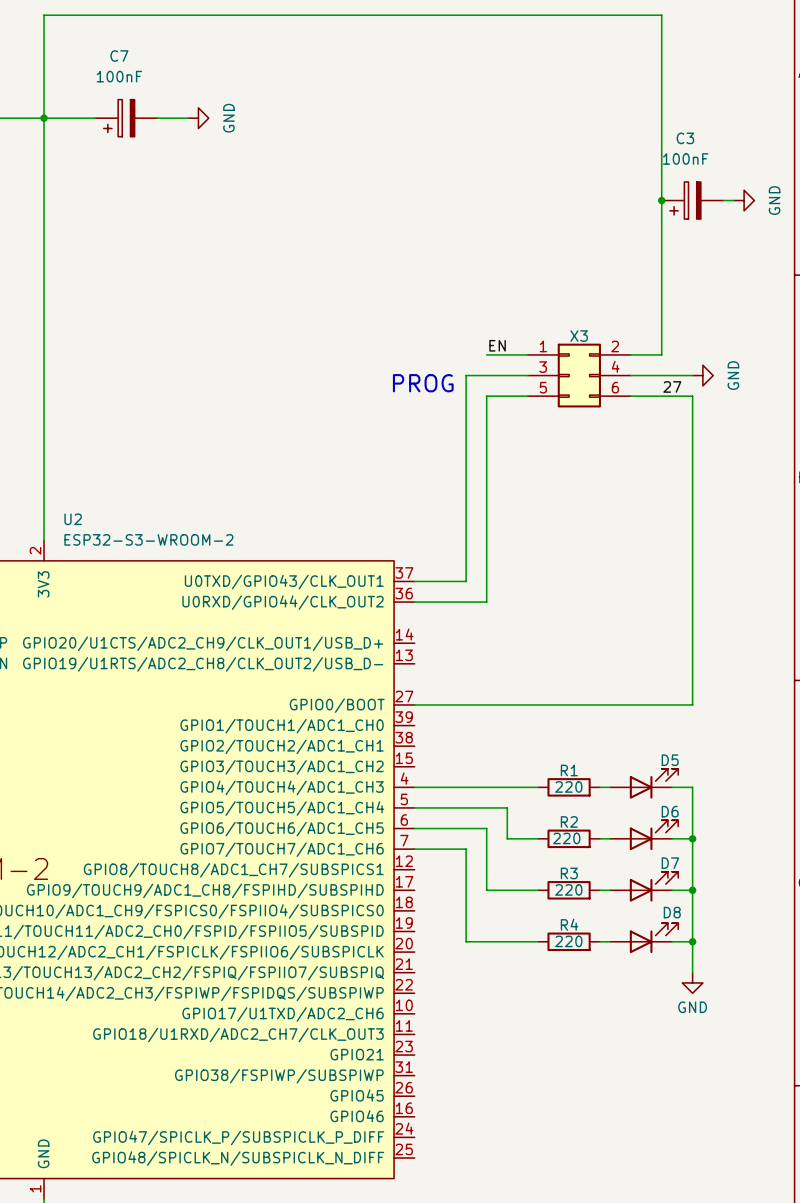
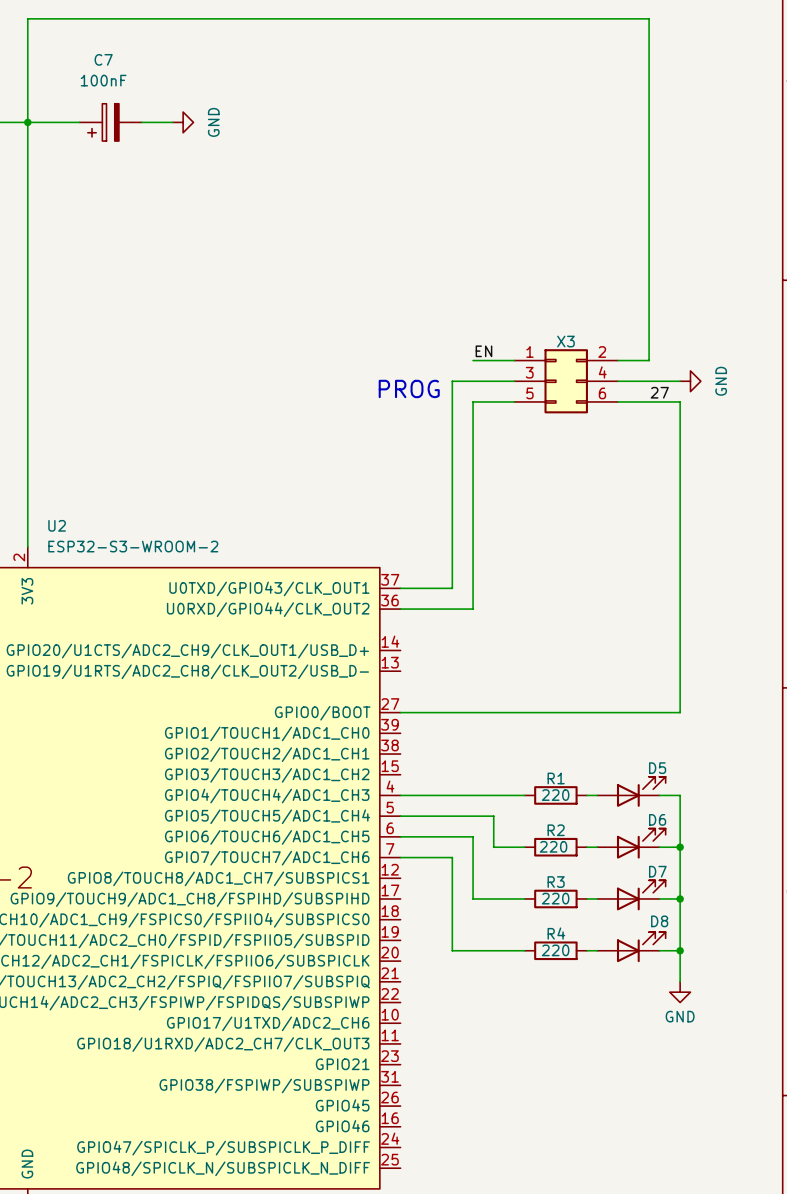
junction: (661, 200) -> none
C3: 100nF (692, 200) -> none
wire: (723, 200) (733, 200) -> none
power symbol: GND (744, 200) -> none

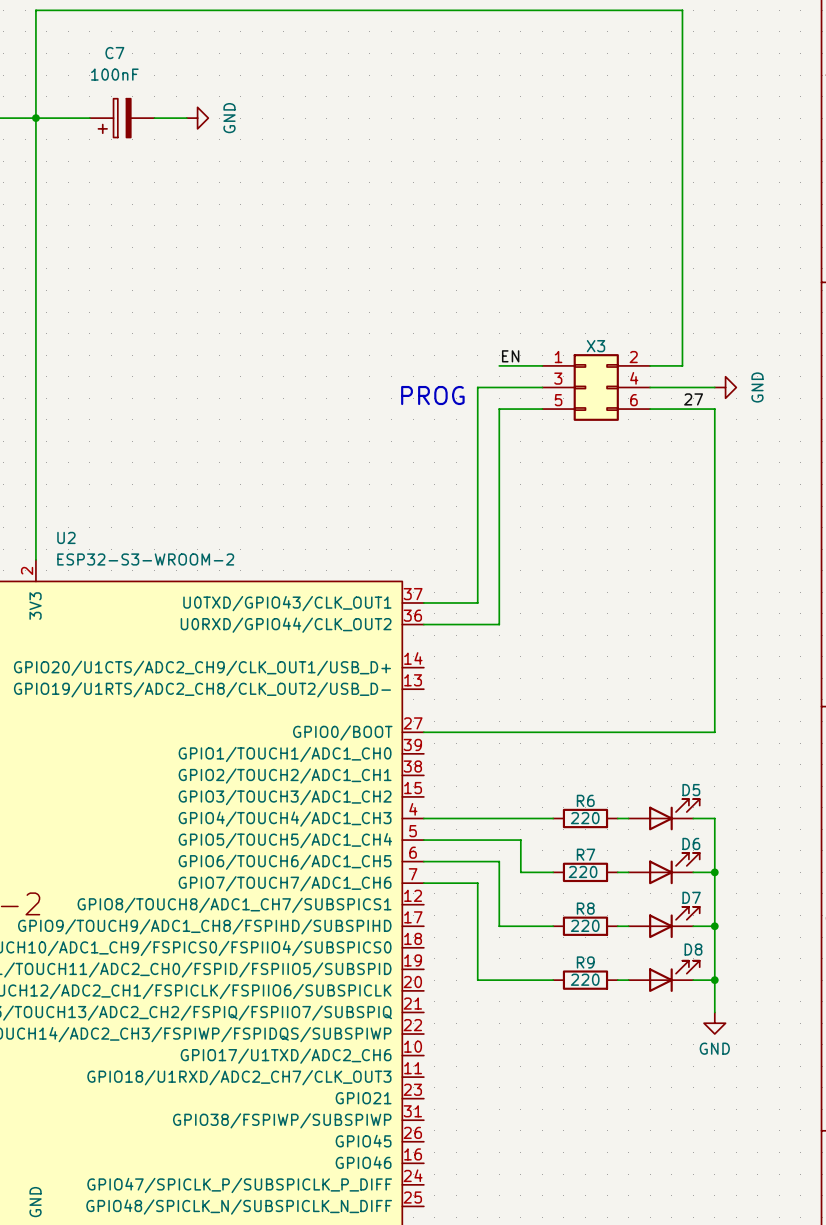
R1 name: R1 (556, 778) -> R6 (585, 800)
R2 name: R2 (556, 830) -> R7 (586, 854)
R3 name: R3 (556, 882) -> R8 (585, 908)
R4 name: R4 (556, 933) -> R9 (585, 962)

